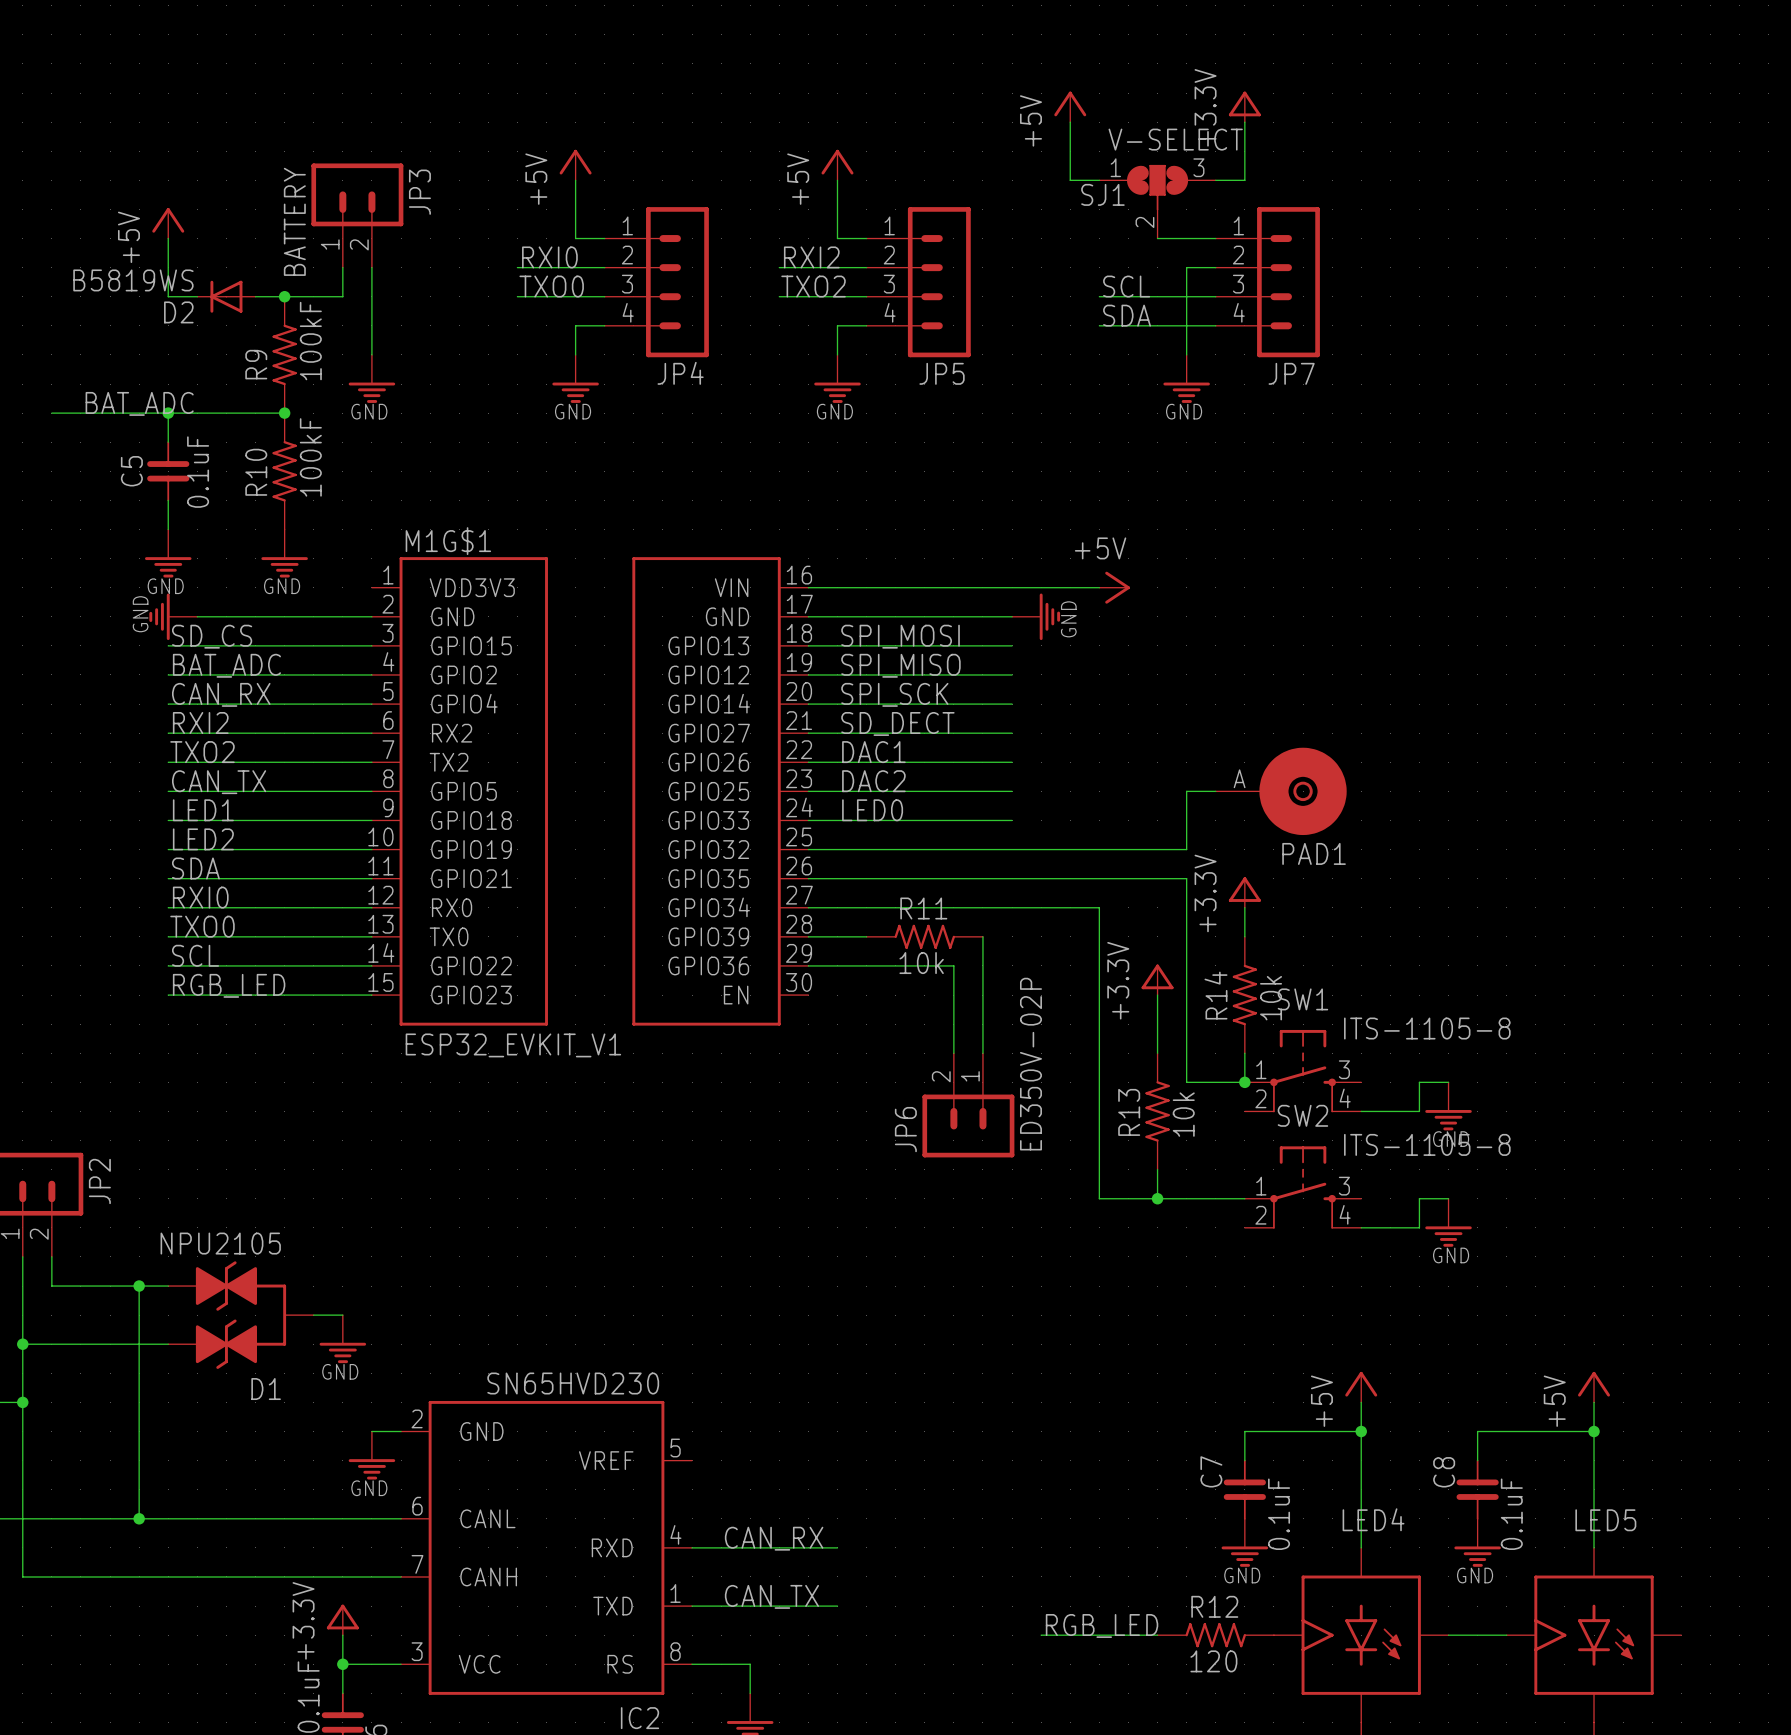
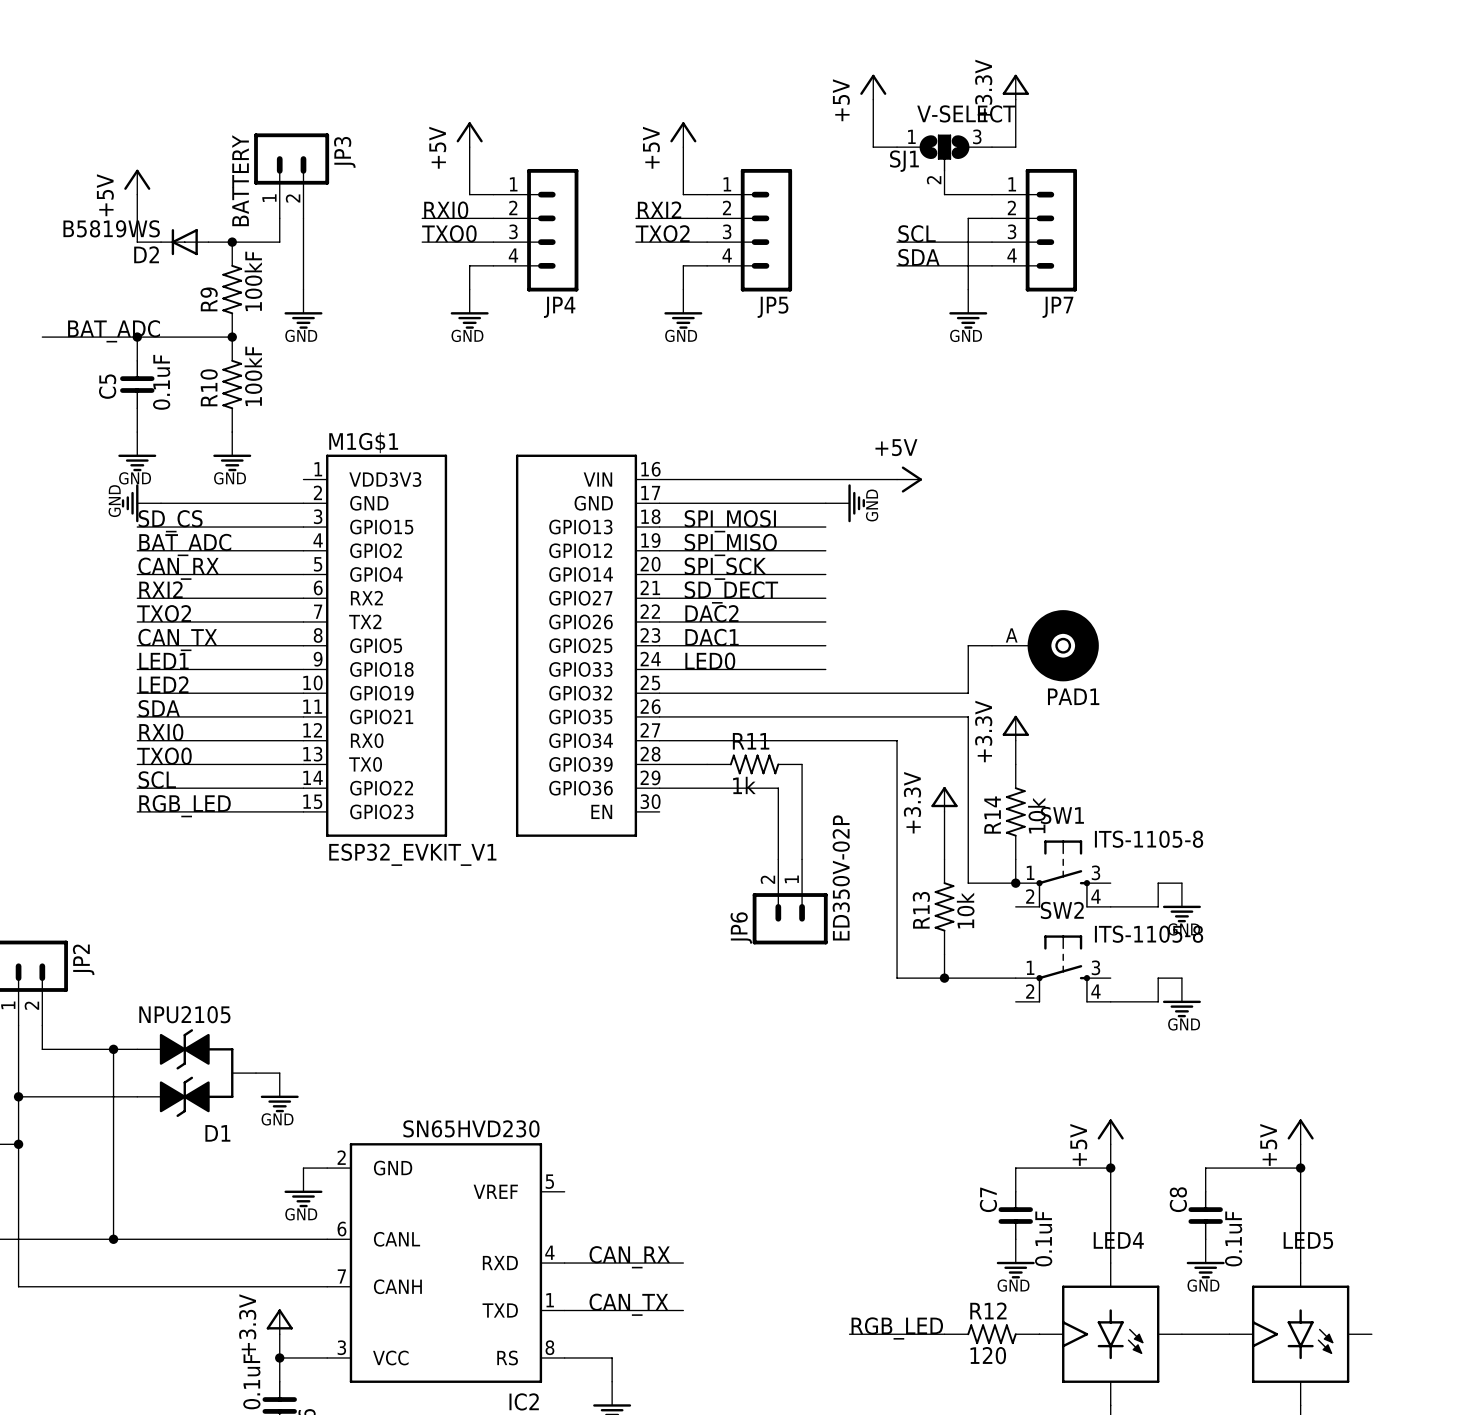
label: DAC1 (873, 752) -> DAC2 (711, 613)
label: DAC2 (873, 781) -> DAC1 (712, 637)
R11 value: 10k (921, 963) -> 1k (744, 785)

